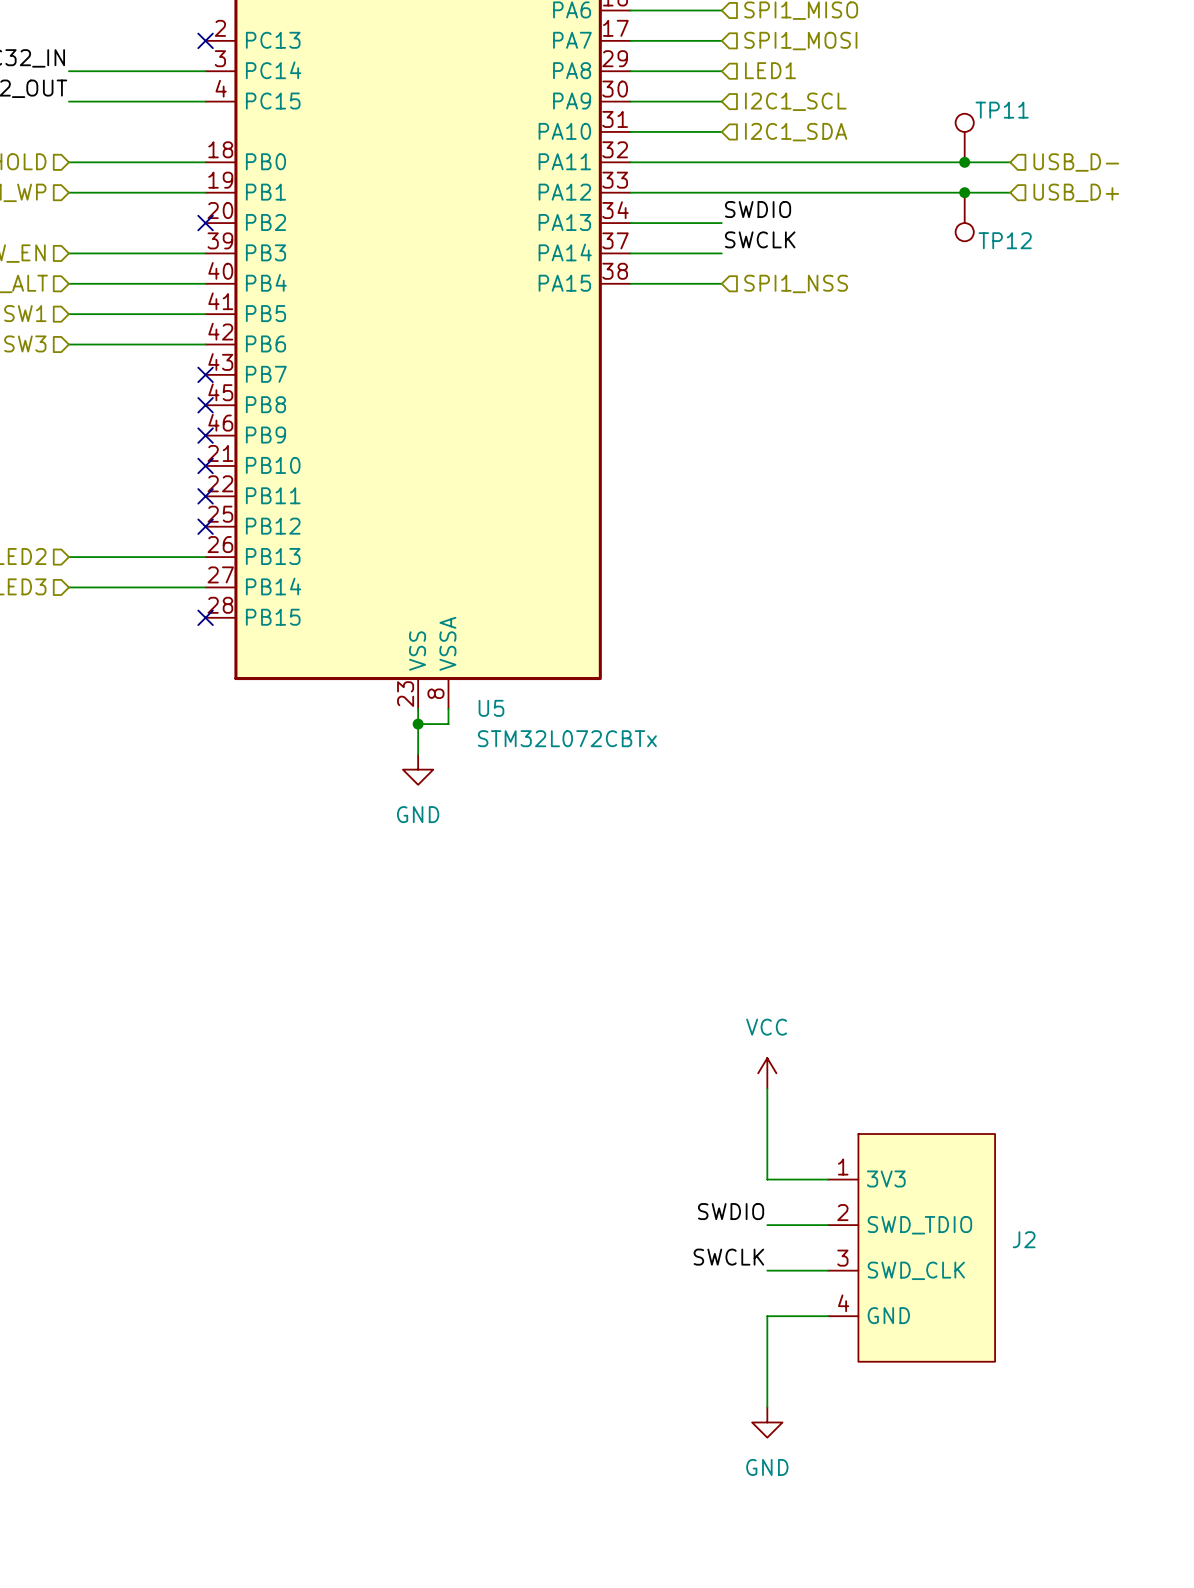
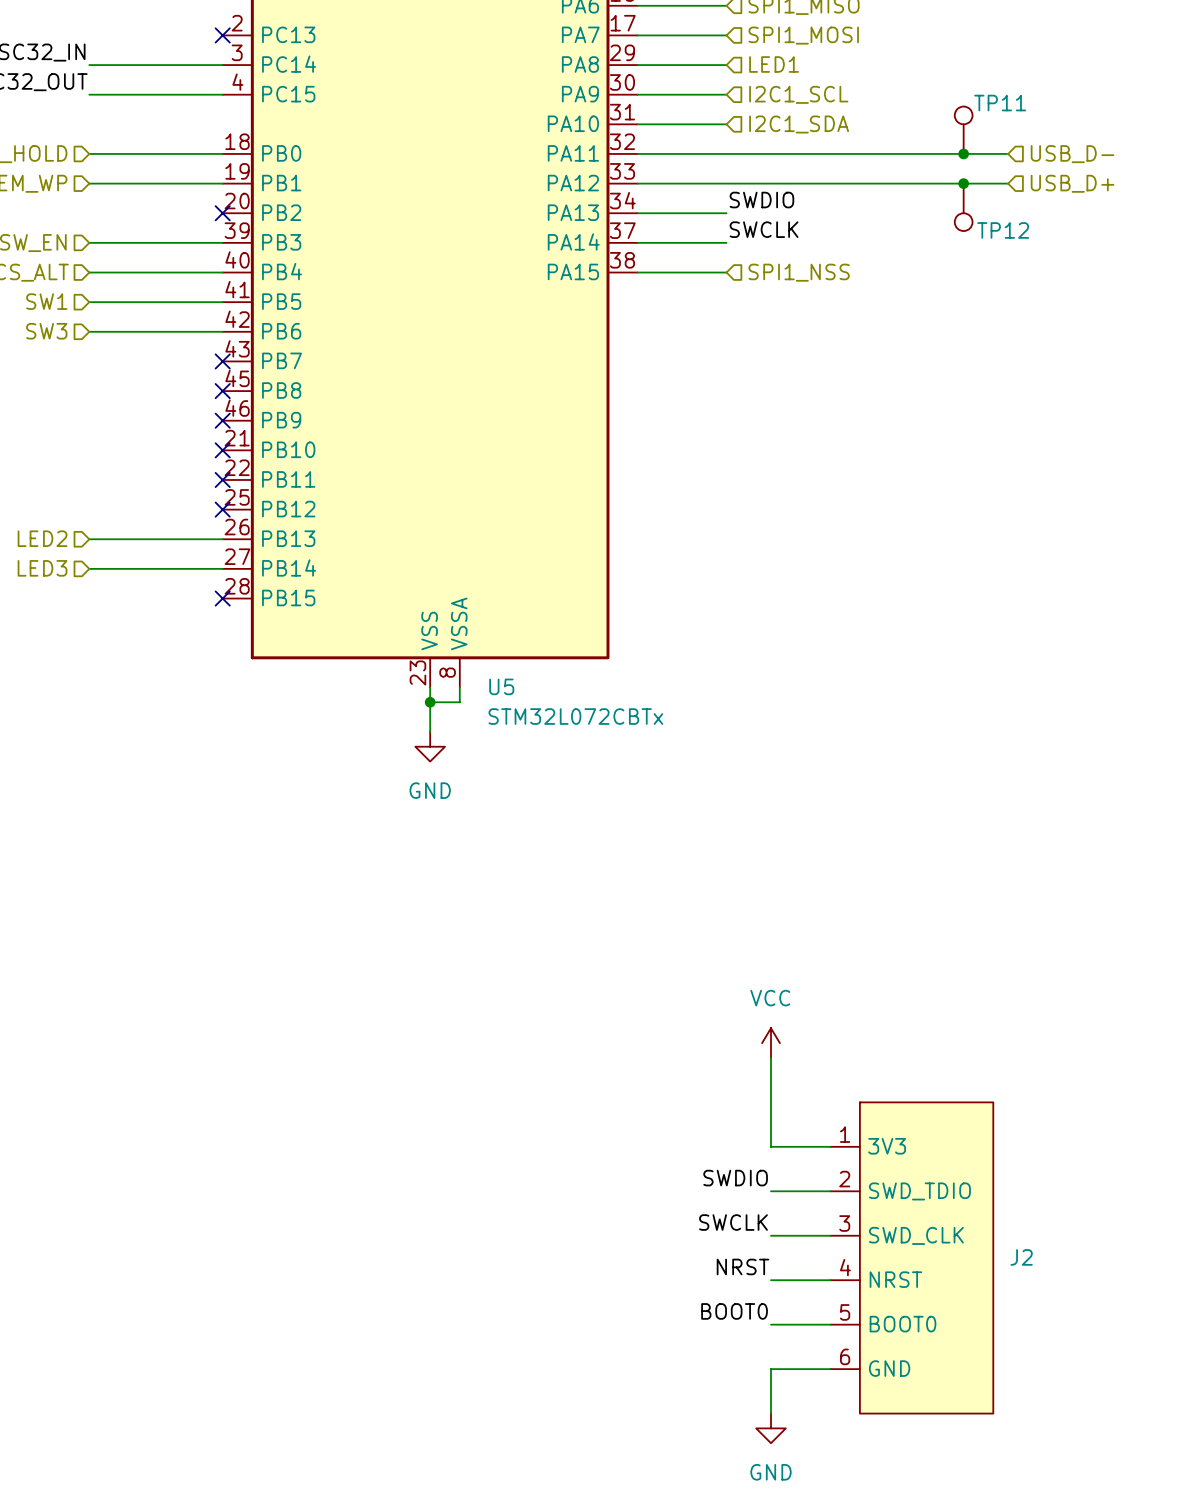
J2 symbol: [828, 1134, 996, 1362] -> [830, 1102, 994, 1414]
label: none -> NRST (743, 1266)
wire: (767, 1316) (767, 1407) -> none
label: none -> BOOT0 (734, 1311)
wire: none -> (771, 1324) (830, 1324)
wire: none -> (830, 1369) (771, 1369) (771, 1413)
power symbol position: GND (767, 1422) -> GND (771, 1428)

